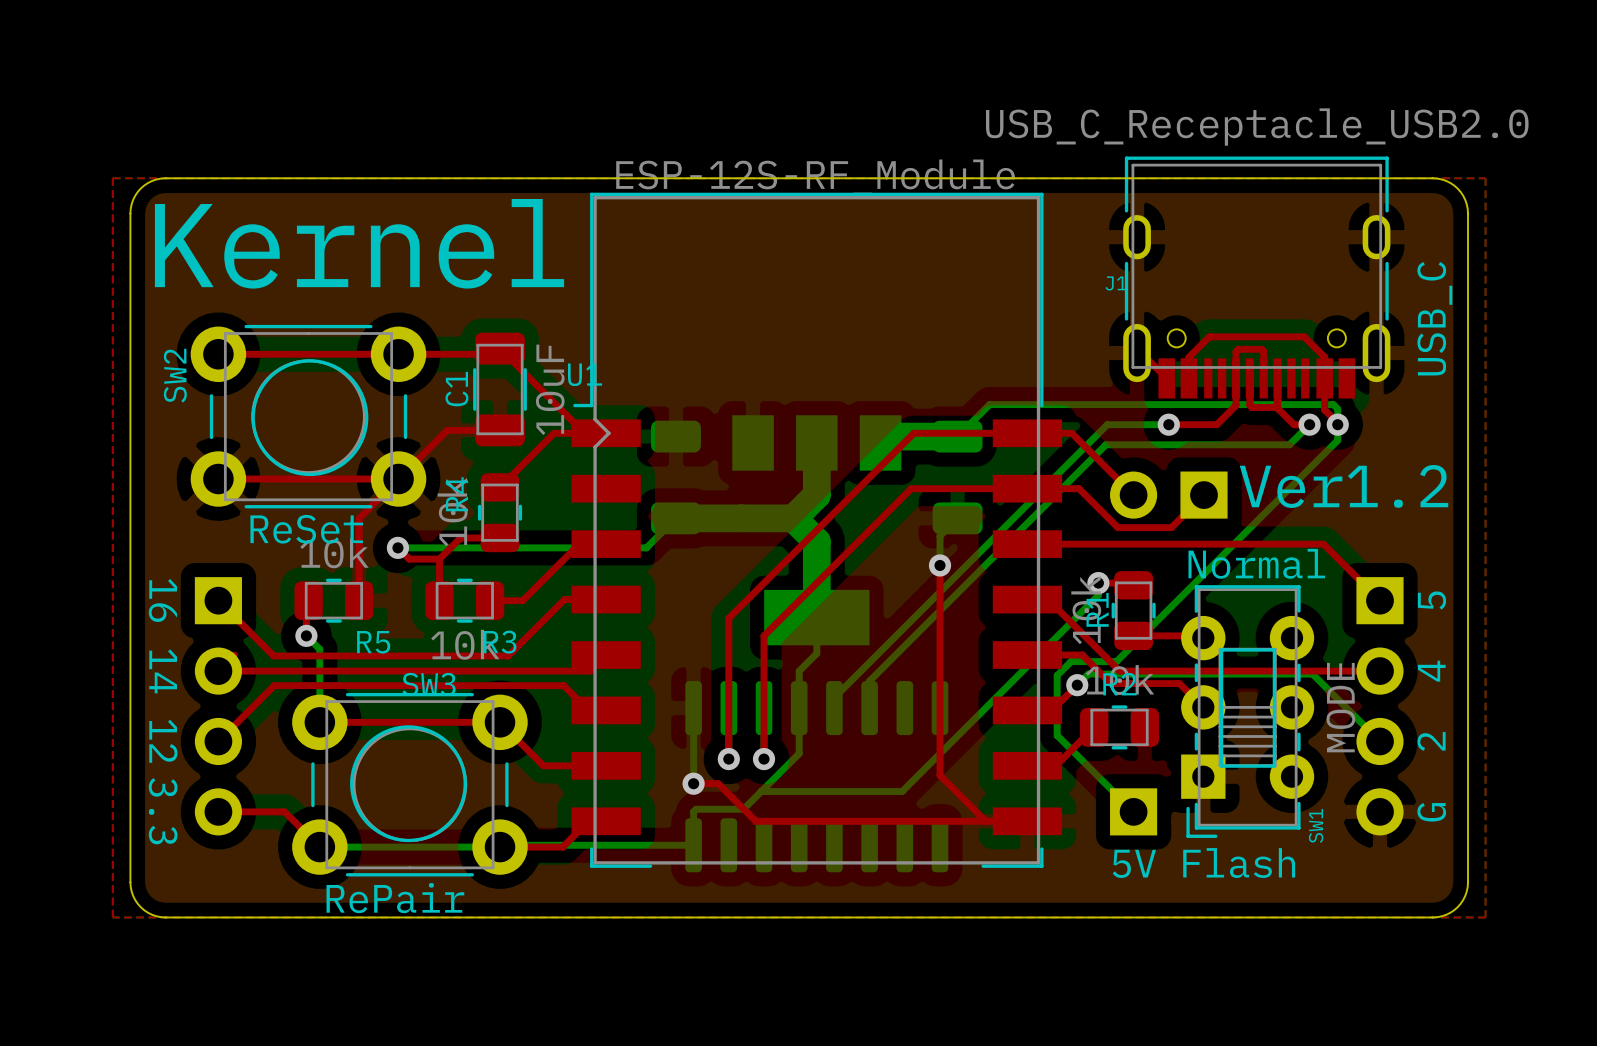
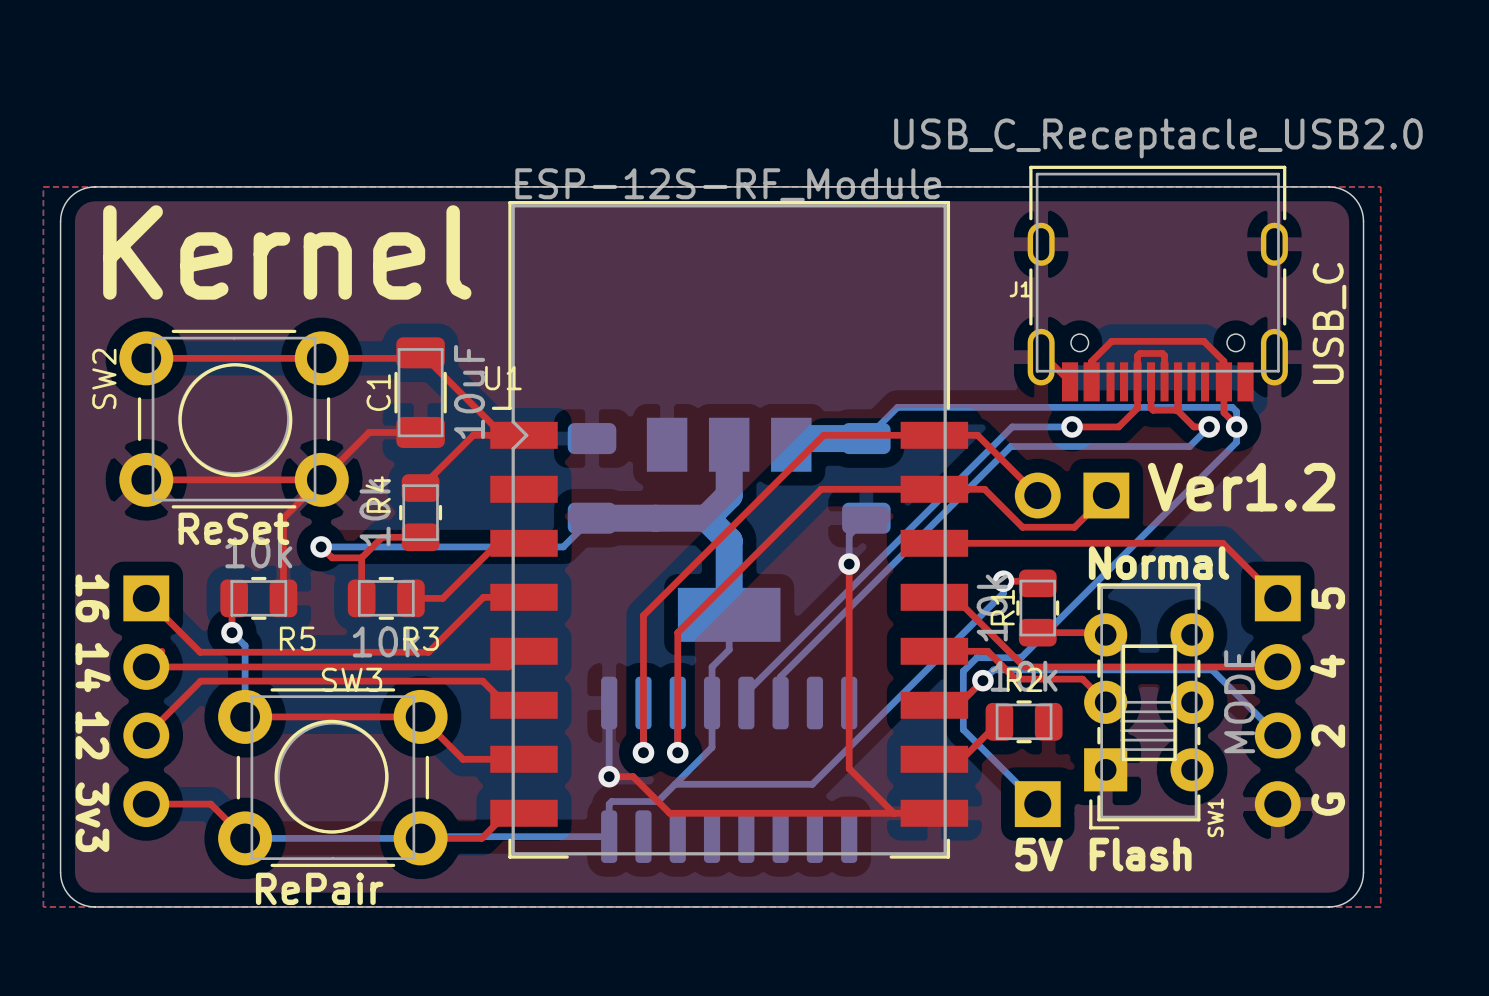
text: 3.3 (163, 811) -> 3v3 (92, 817)

